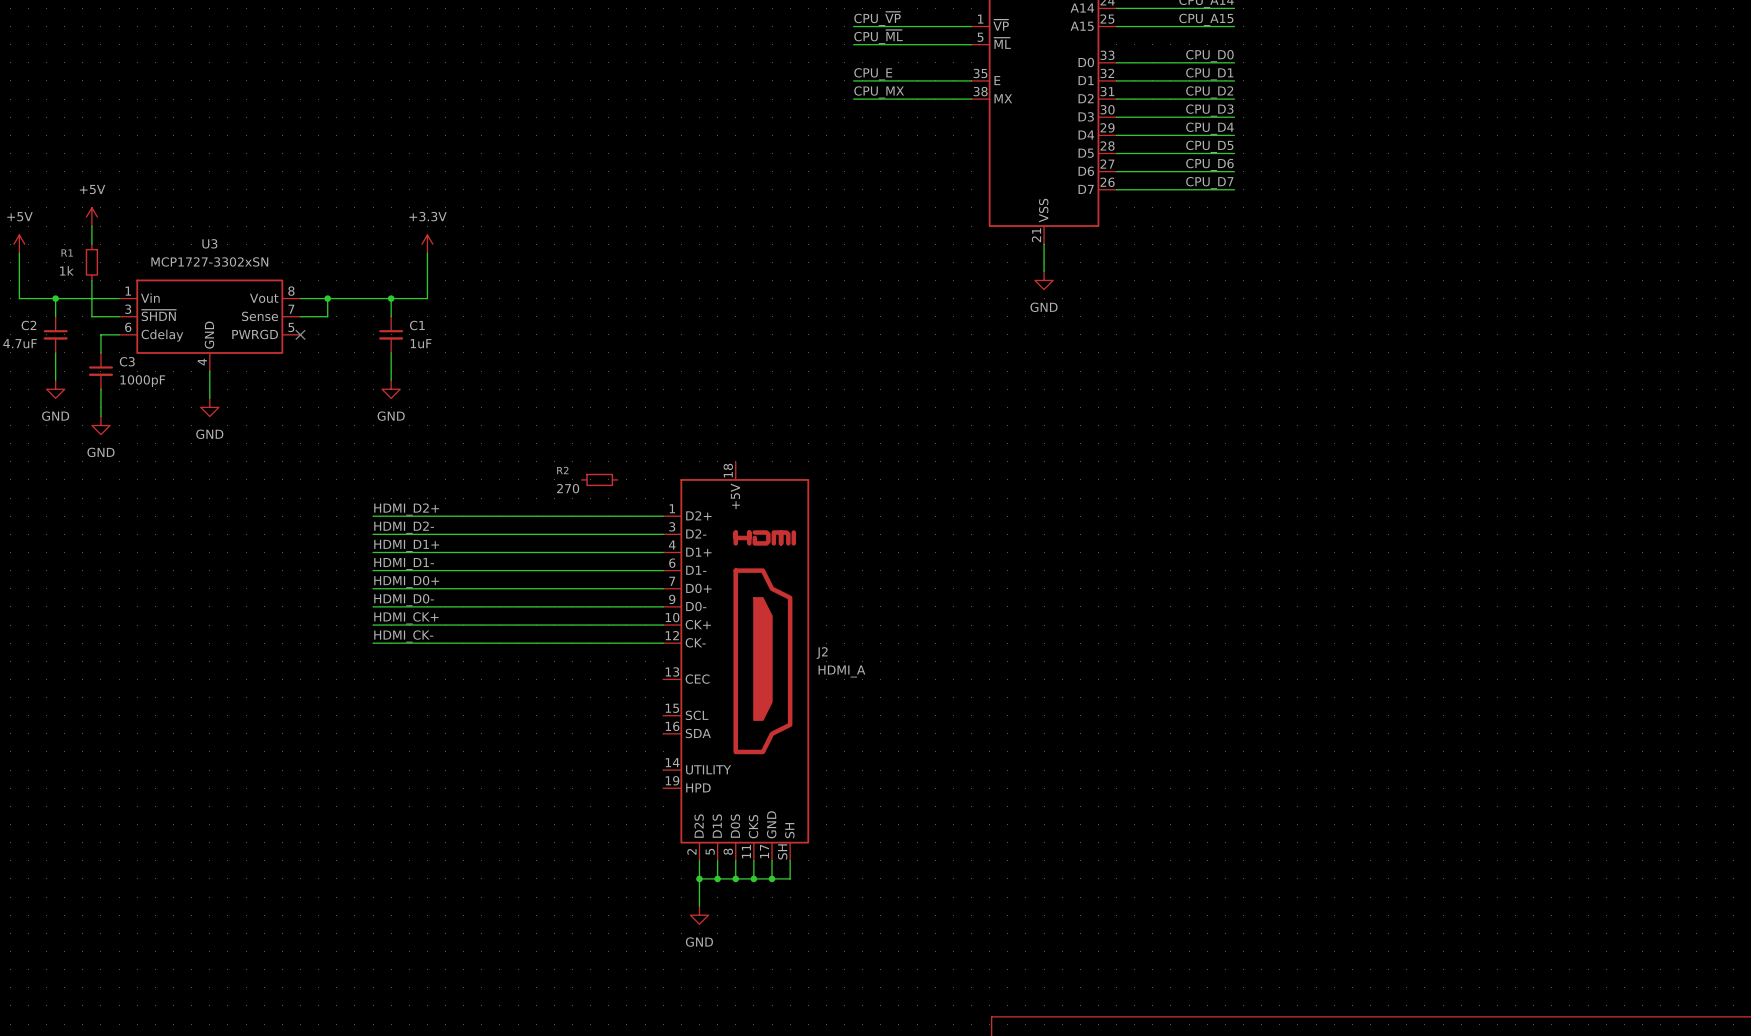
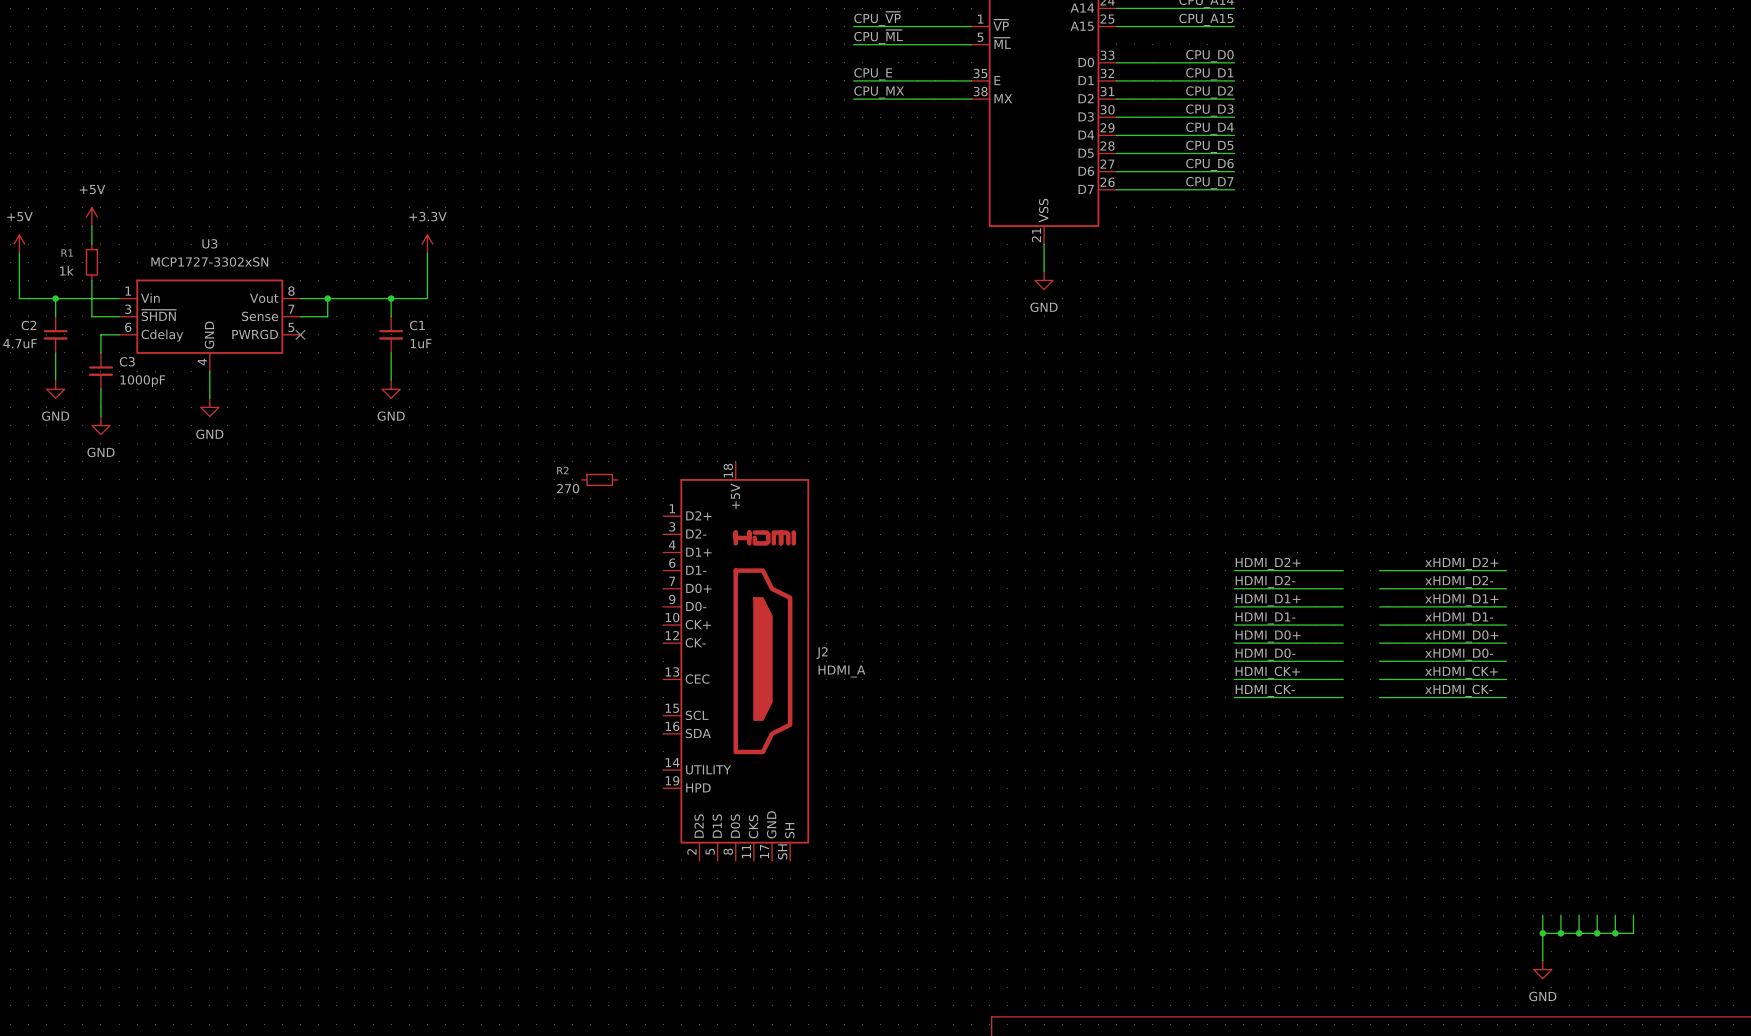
label: HDMI_D2+ (406, 509) -> none
wire: (373, 516) (663, 516) -> none
label: HDMI_D2- (404, 527) -> none
wire: (373, 534) (663, 534) -> none
label: HDMI_D1+ (406, 545) -> none
wire: (373, 552) (663, 552) -> none
label: HDMI_D1- (404, 563) -> none
label: none -> HDMI_D2+ (1268, 563)
label: none -> xHDMI_D2+ (1461, 563)
wire: (373, 570) (663, 570) -> none
wire: none -> (1234, 570) (1343, 570)
wire: none -> (1379, 570) (1506, 570)
label: HDMI_D0+ (406, 582) -> none
label: none -> HDMI_D2- (1265, 582)
label: none -> xHDMI_D2- (1459, 582)
wire: (373, 588) (663, 588) -> none
wire: none -> (1234, 588) (1343, 588)
wire: none -> (1379, 588) (1506, 588)
label: HDMI_D0- (404, 600) -> none
label: none -> HDMI_D1+ (1268, 600)
label: none -> xHDMI_D1+ (1461, 600)
wire: (373, 606) (663, 606) -> none
wire: none -> (1234, 606) (1343, 606)
wire: none -> (1379, 606) (1506, 606)
label: HDMI_CK+ (406, 618) -> none
label: none -> HDMI_D1- (1265, 618)
label: none -> xHDMI_D1- (1459, 618)
wire: (373, 625) (663, 625) -> none
wire: none -> (1234, 625) (1343, 625)
wire: none -> (1379, 625) (1506, 625)
label: HDMI_CK- (403, 636) -> none
label: none -> HDMI_D0+ (1268, 636)
label: none -> xHDMI_D0+ (1461, 636)
wire: (373, 643) (663, 643) -> none
wire: none -> (1234, 643) (1343, 643)
wire: none -> (1379, 643) (1506, 643)
label: none -> HDMI_D0- (1265, 654)
label: none -> xHDMI_D0- (1459, 654)
wire: none -> (1234, 661) (1343, 661)
wire: none -> (1379, 661) (1506, 661)
label: none -> HDMI_CK+ (1267, 672)
label: none -> xHDMI_CK+ (1461, 672)
wire: none -> (1234, 679) (1343, 679)
wire: none -> (1379, 679) (1506, 679)
label: none -> HDMI_CK- (1265, 690)
label: none -> xHDMI_CK- (1458, 690)
wire: none -> (1234, 697) (1343, 697)
wire: none -> (1379, 697) (1506, 697)
wire: (699, 860) (699, 906) -> none
wire: (717, 860) (717, 878) -> none
wire: (735, 860) (735, 878) -> none
wire: (753, 860) (753, 878) -> none
wire: (772, 860) (772, 878) -> none
wire: (790, 860) (790, 878) (699, 878) -> none
junction: (699, 878) -> none
junction: (717, 878) -> none
junction: (735, 878) -> none
junction: (753, 878) -> none
junction: (772, 878) -> none
power symbol: GND (699, 915) -> none
wire: none -> (1542, 915) (1542, 960)
wire: none -> (1560, 915) (1560, 933)
wire: none -> (1579, 915) (1579, 933)
wire: none -> (1597, 915) (1597, 933)
wire: none -> (1615, 915) (1615, 933)
wire: none -> (1633, 915) (1633, 933) (1542, 933)
junction: none -> (1542, 933)
junction: none -> (1560, 933)
junction: none -> (1579, 933)
junction: none -> (1597, 933)
junction: none -> (1615, 933)
power symbol: none -> GND (1542, 969)

